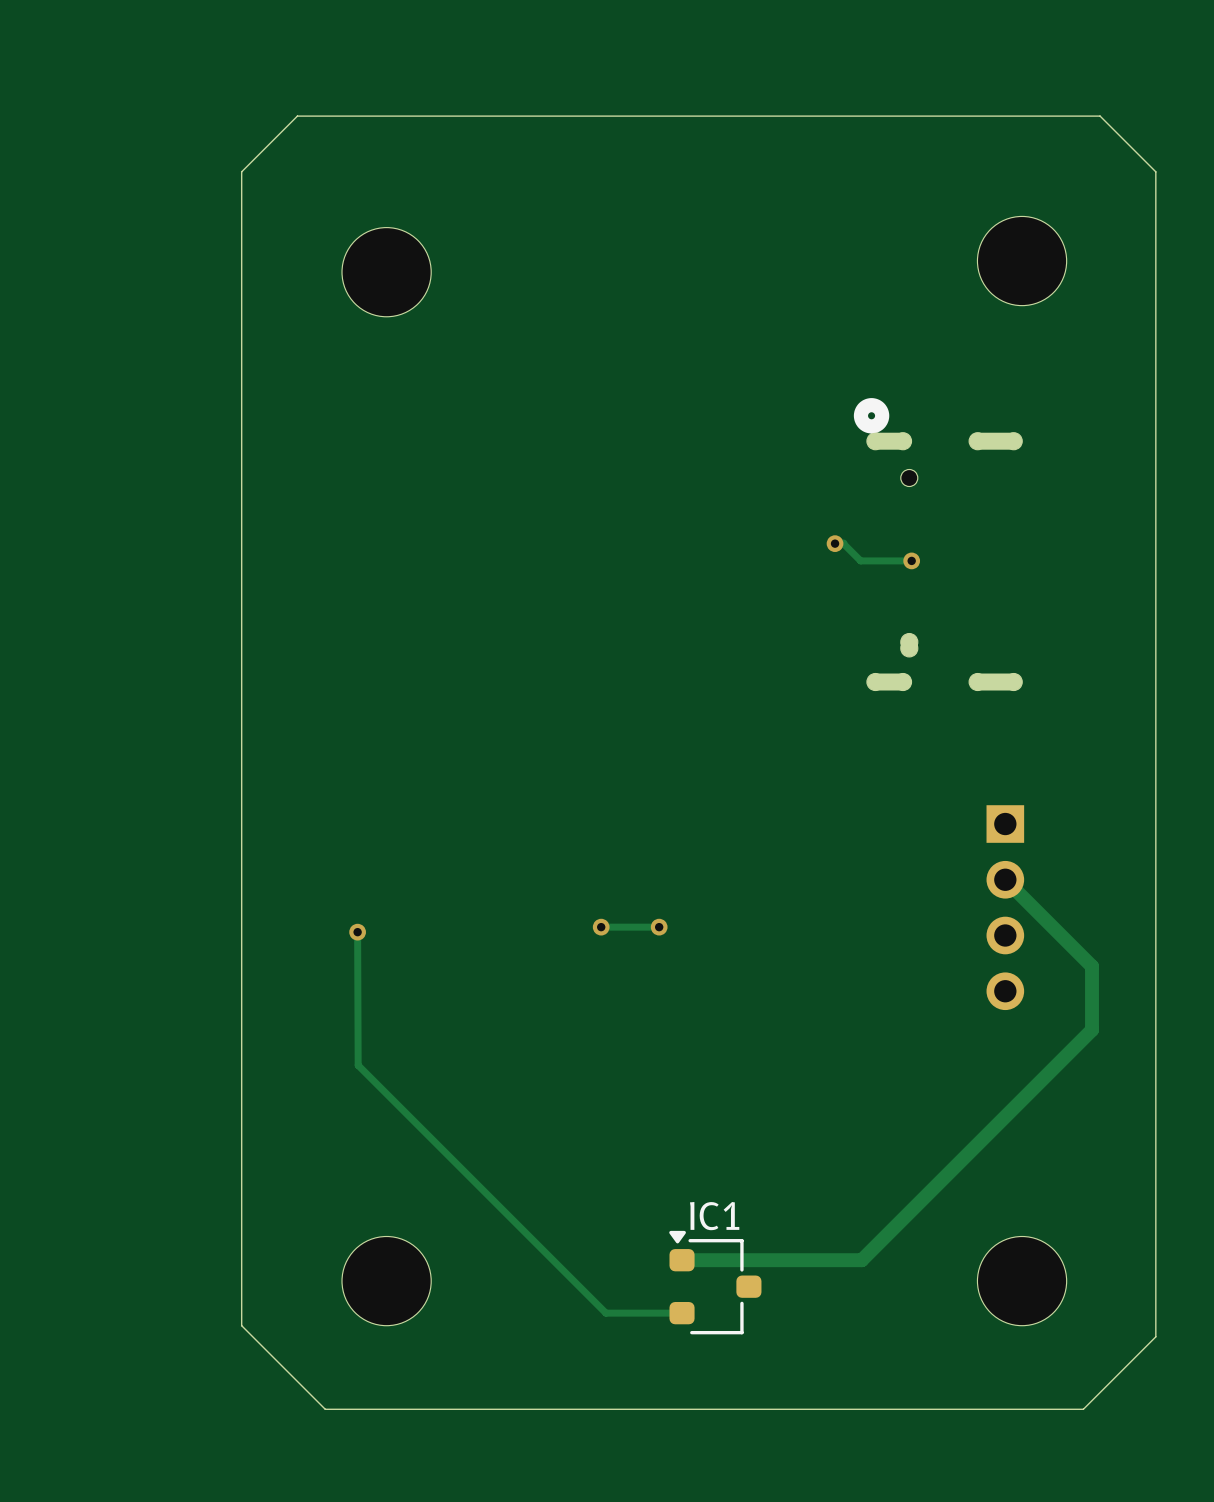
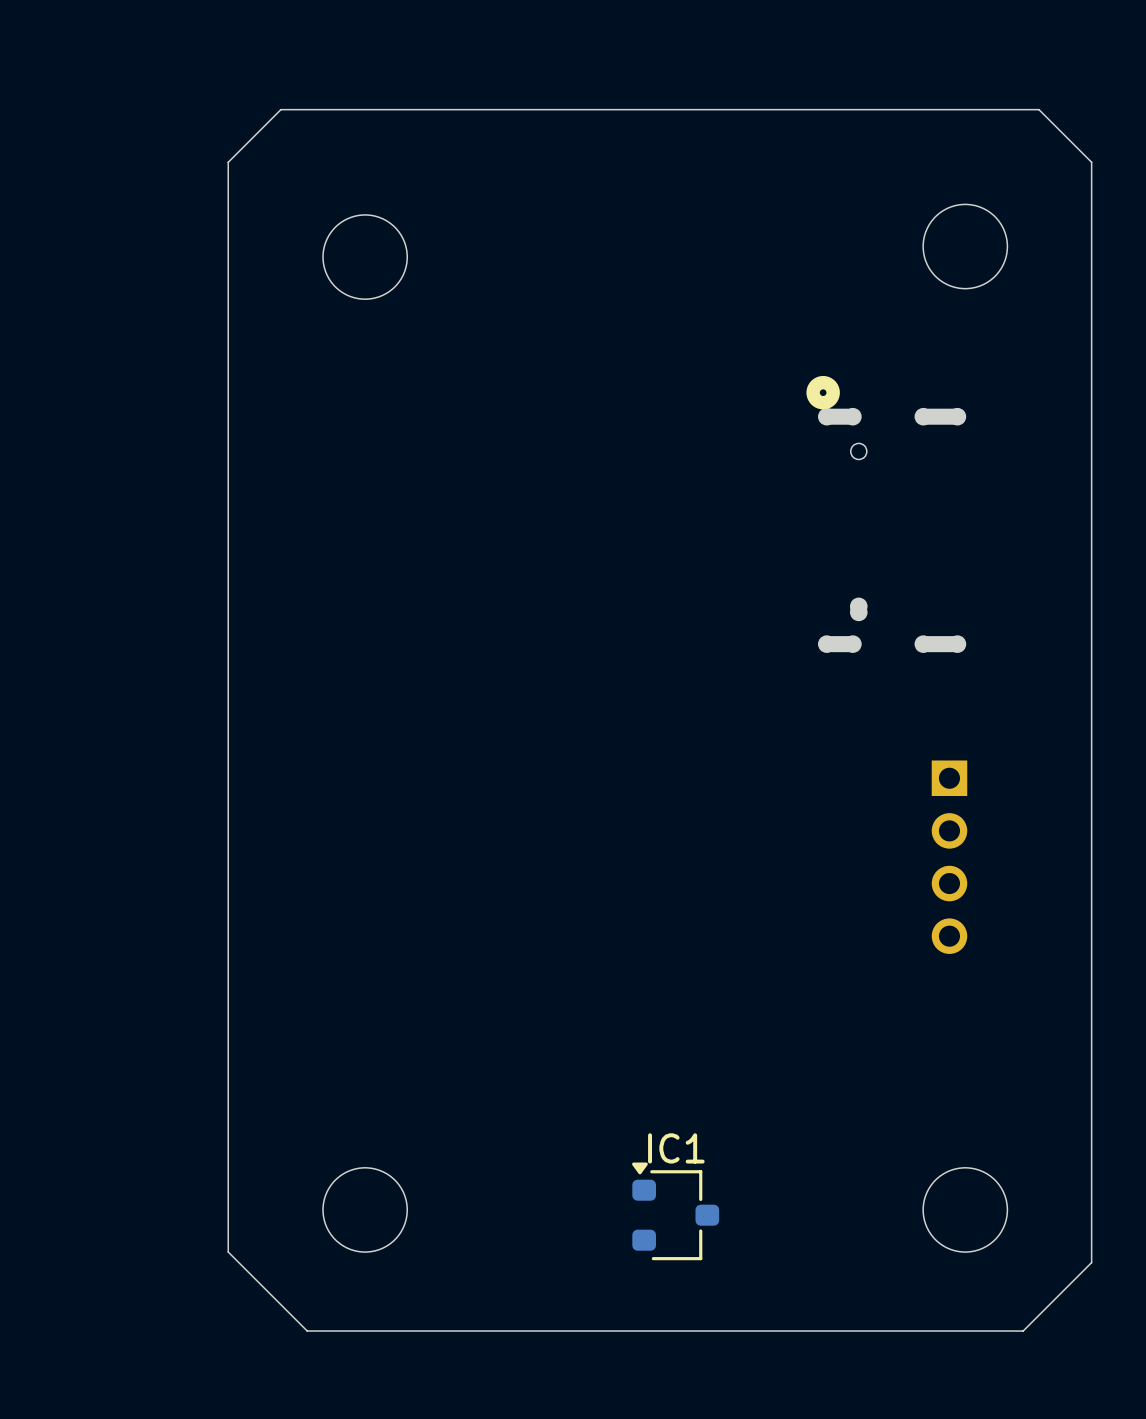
track: (835, 543) (843, 543) (860, 560) (911, 560) -> none
via: (835, 543) -> none
via: (911, 560) -> none
track: (1005, 879) (1092, 966) (1092, 1029) (861, 1260) (682, 1260) -> none
via: (601, 927) -> none
track: (659, 927) (601, 927) -> none
via: (659, 927) -> none
via: (357, 932) -> none
track: (358, 932) (358, 1065) (605, 1313) (682, 1313) -> none

